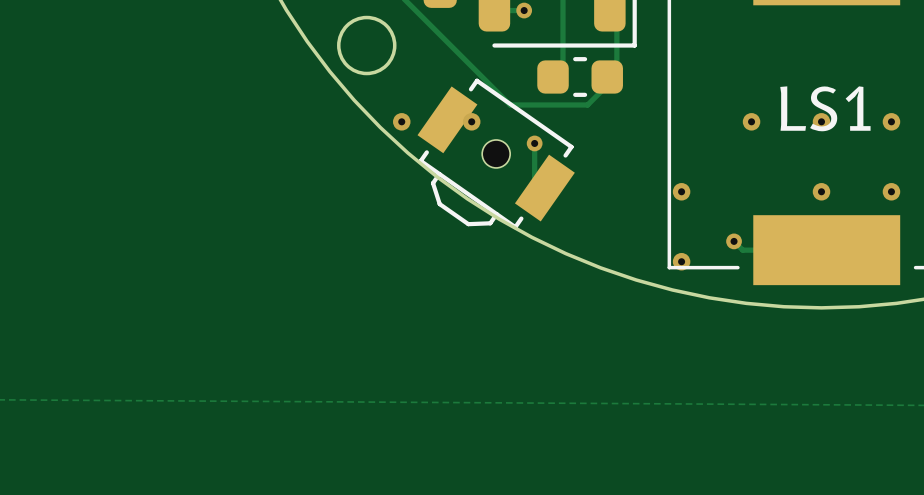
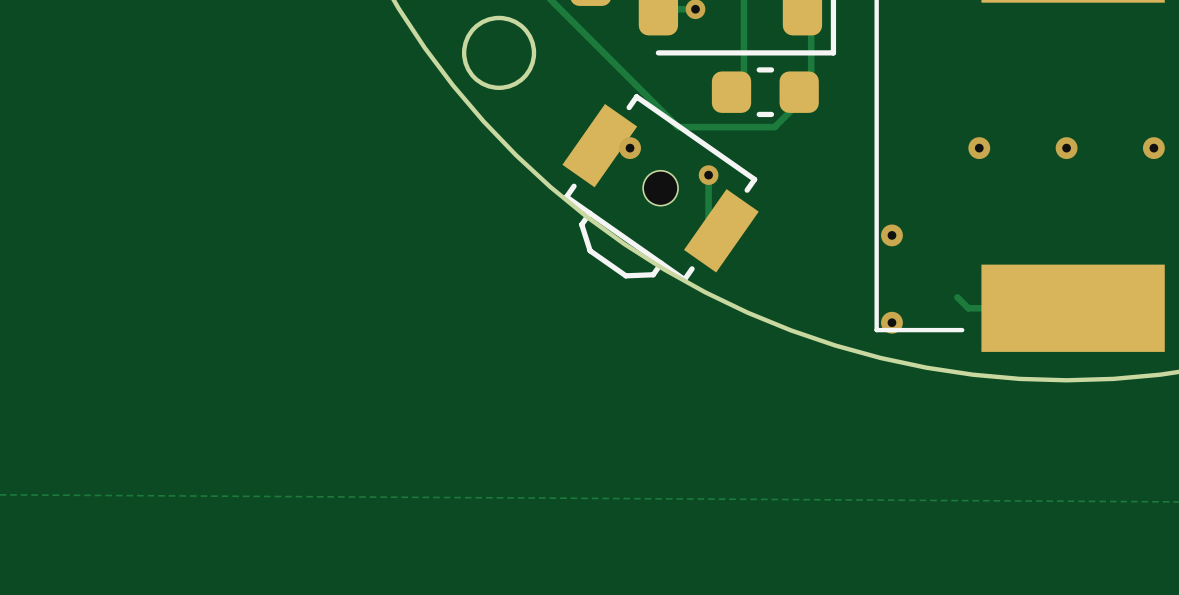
LS1 name: LS1 (825, 108) -> none
via: (401, 121) -> none
via: (821, 191) -> none
via: (891, 191) -> none
via: (734, 241) -> none

